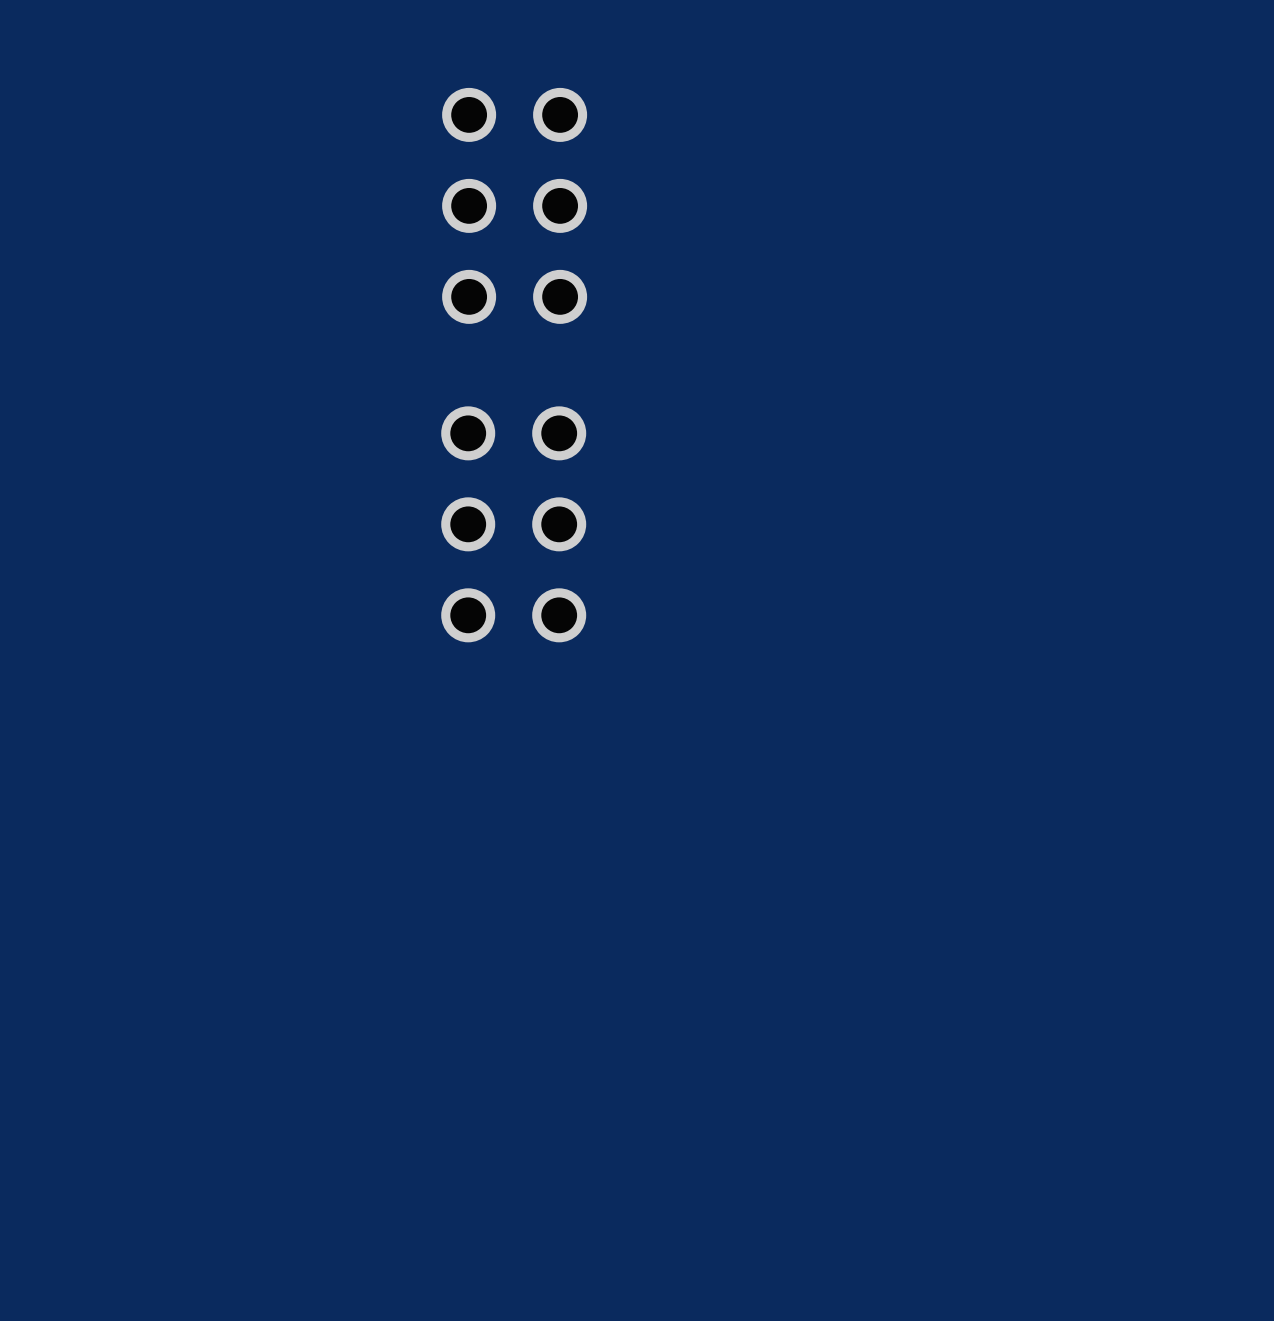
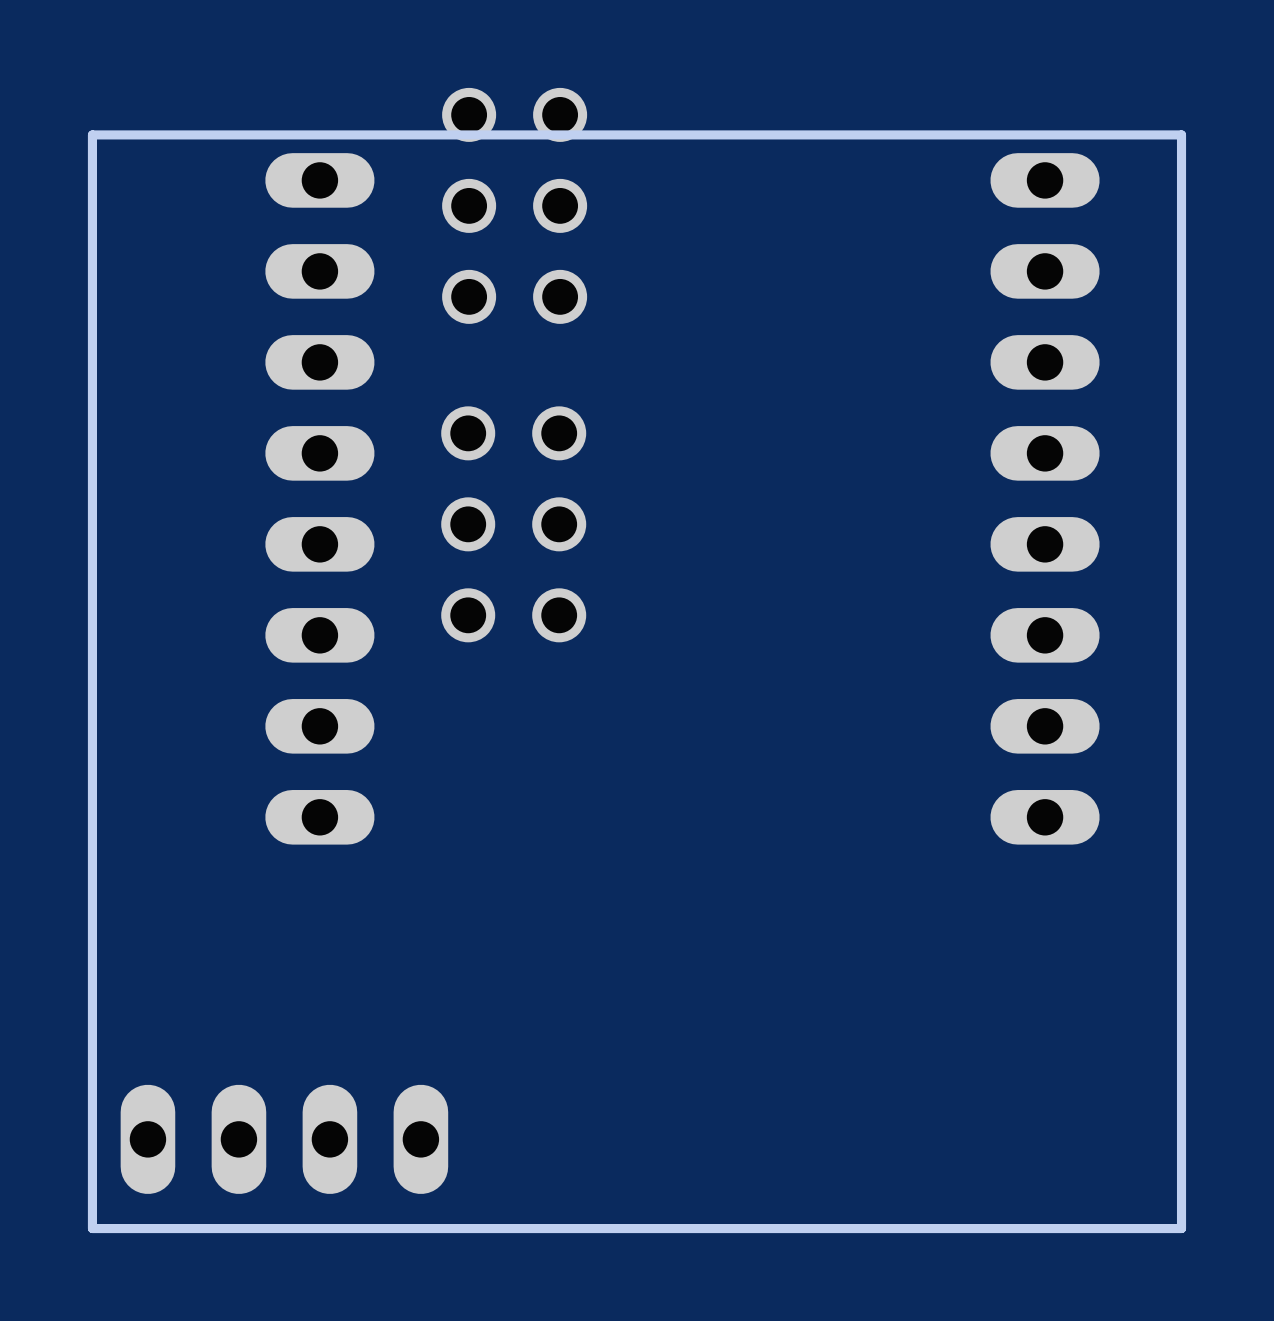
board edge: none -> (1181, 134) (92, 134) (92, 1228) (1181, 1228) (1181, 134)
part: none -> (319, 498)
part: none -> (1045, 498)
part: none -> (284, 1139)

